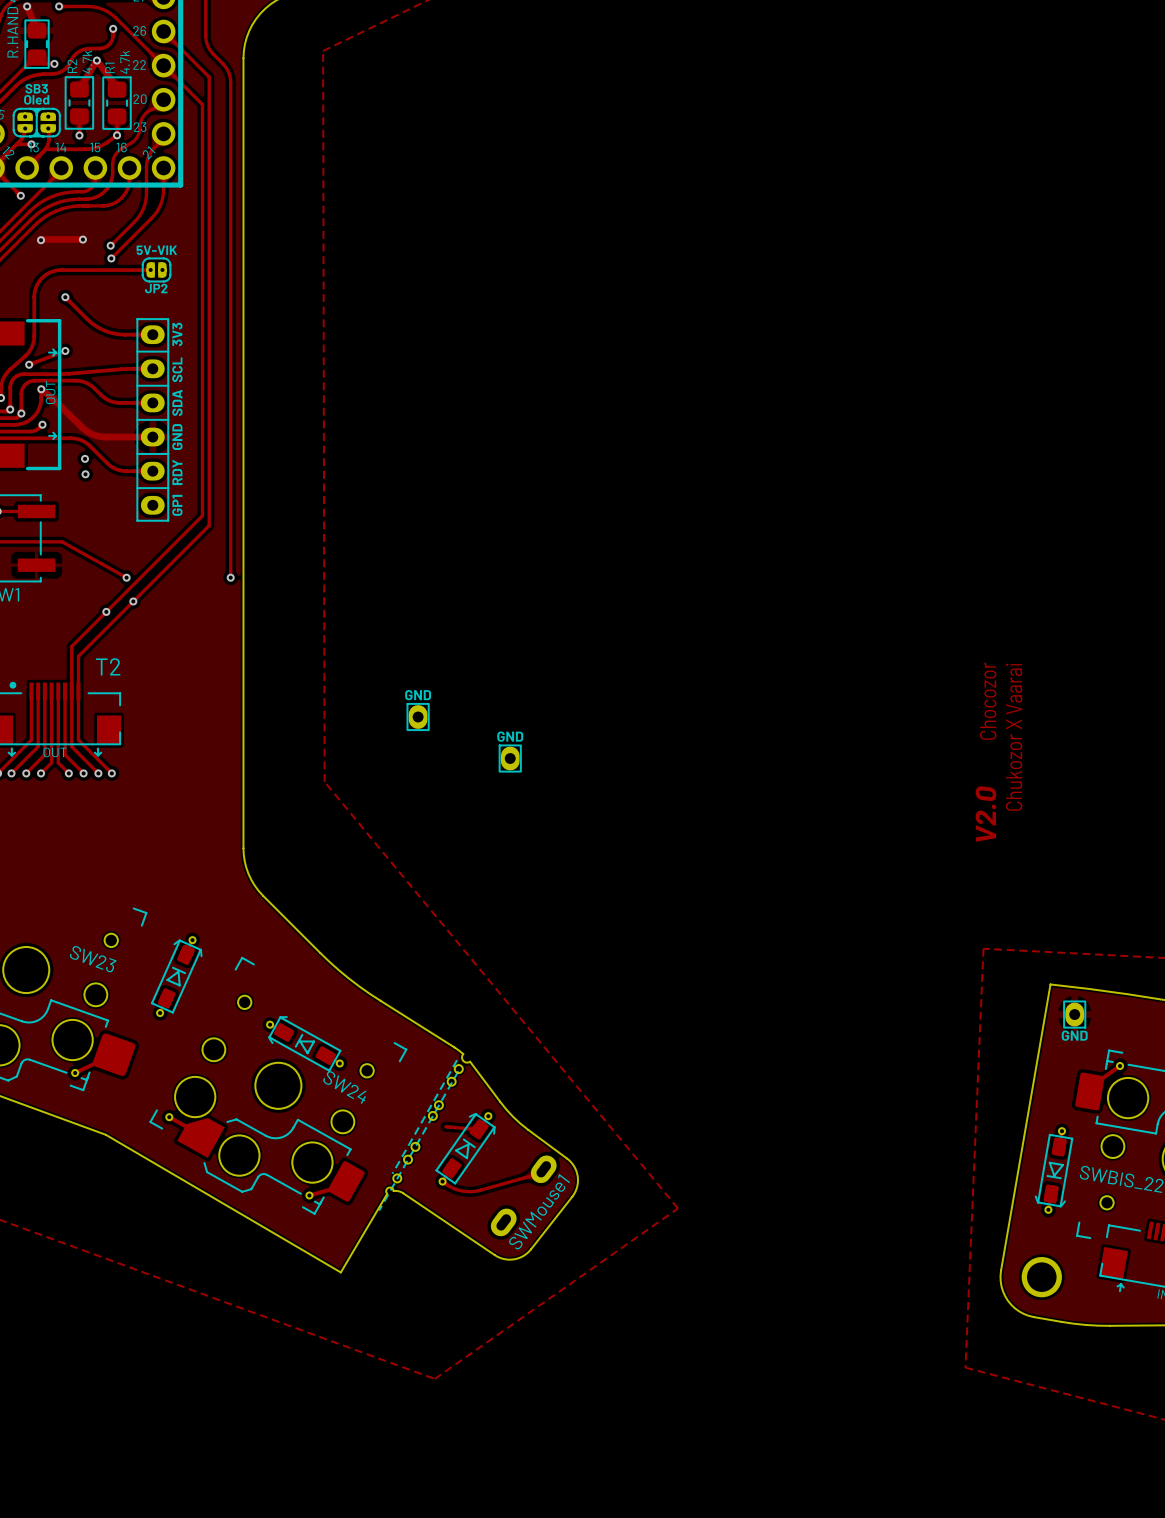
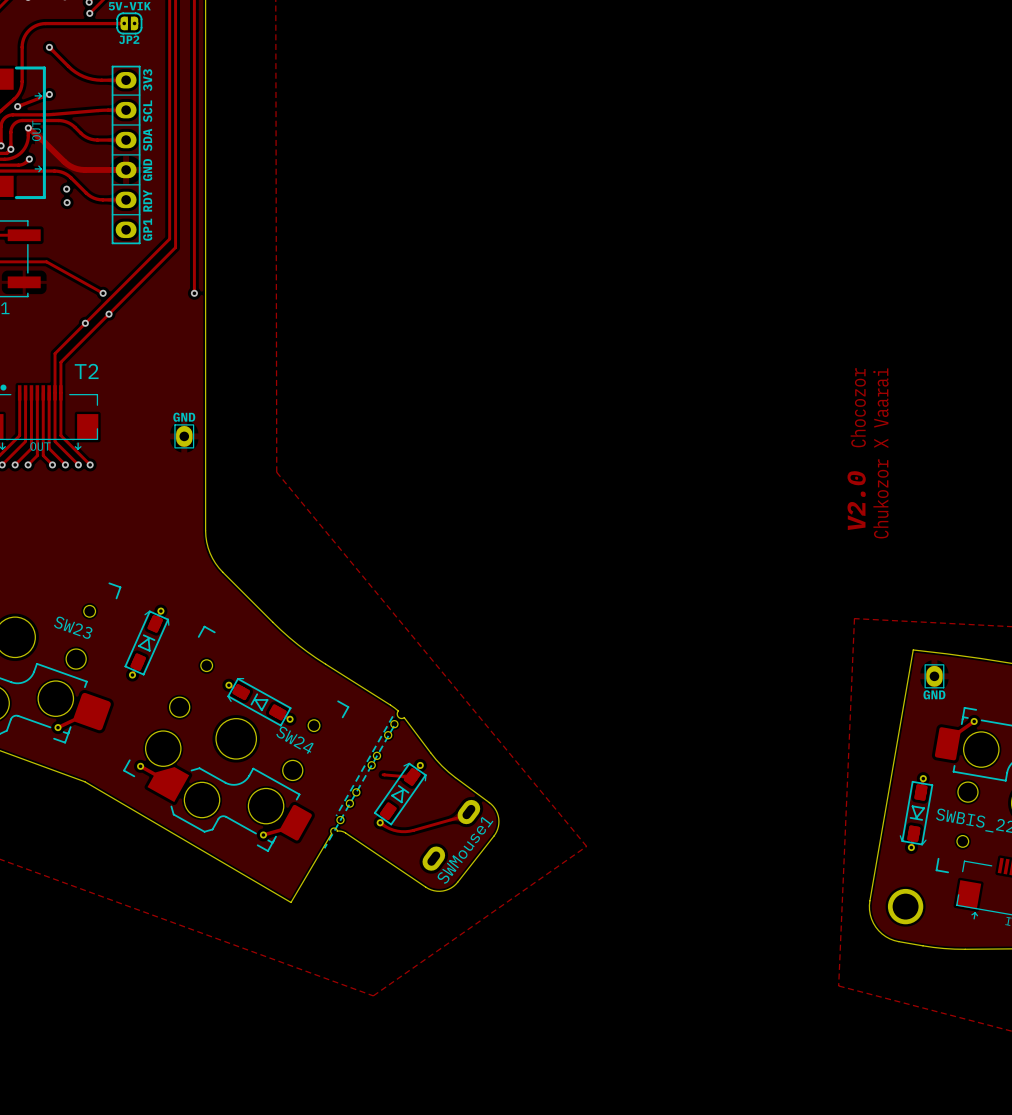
part: (418, 717) -> none
part: none -> (184, 436)
part: (510, 758) -> none

